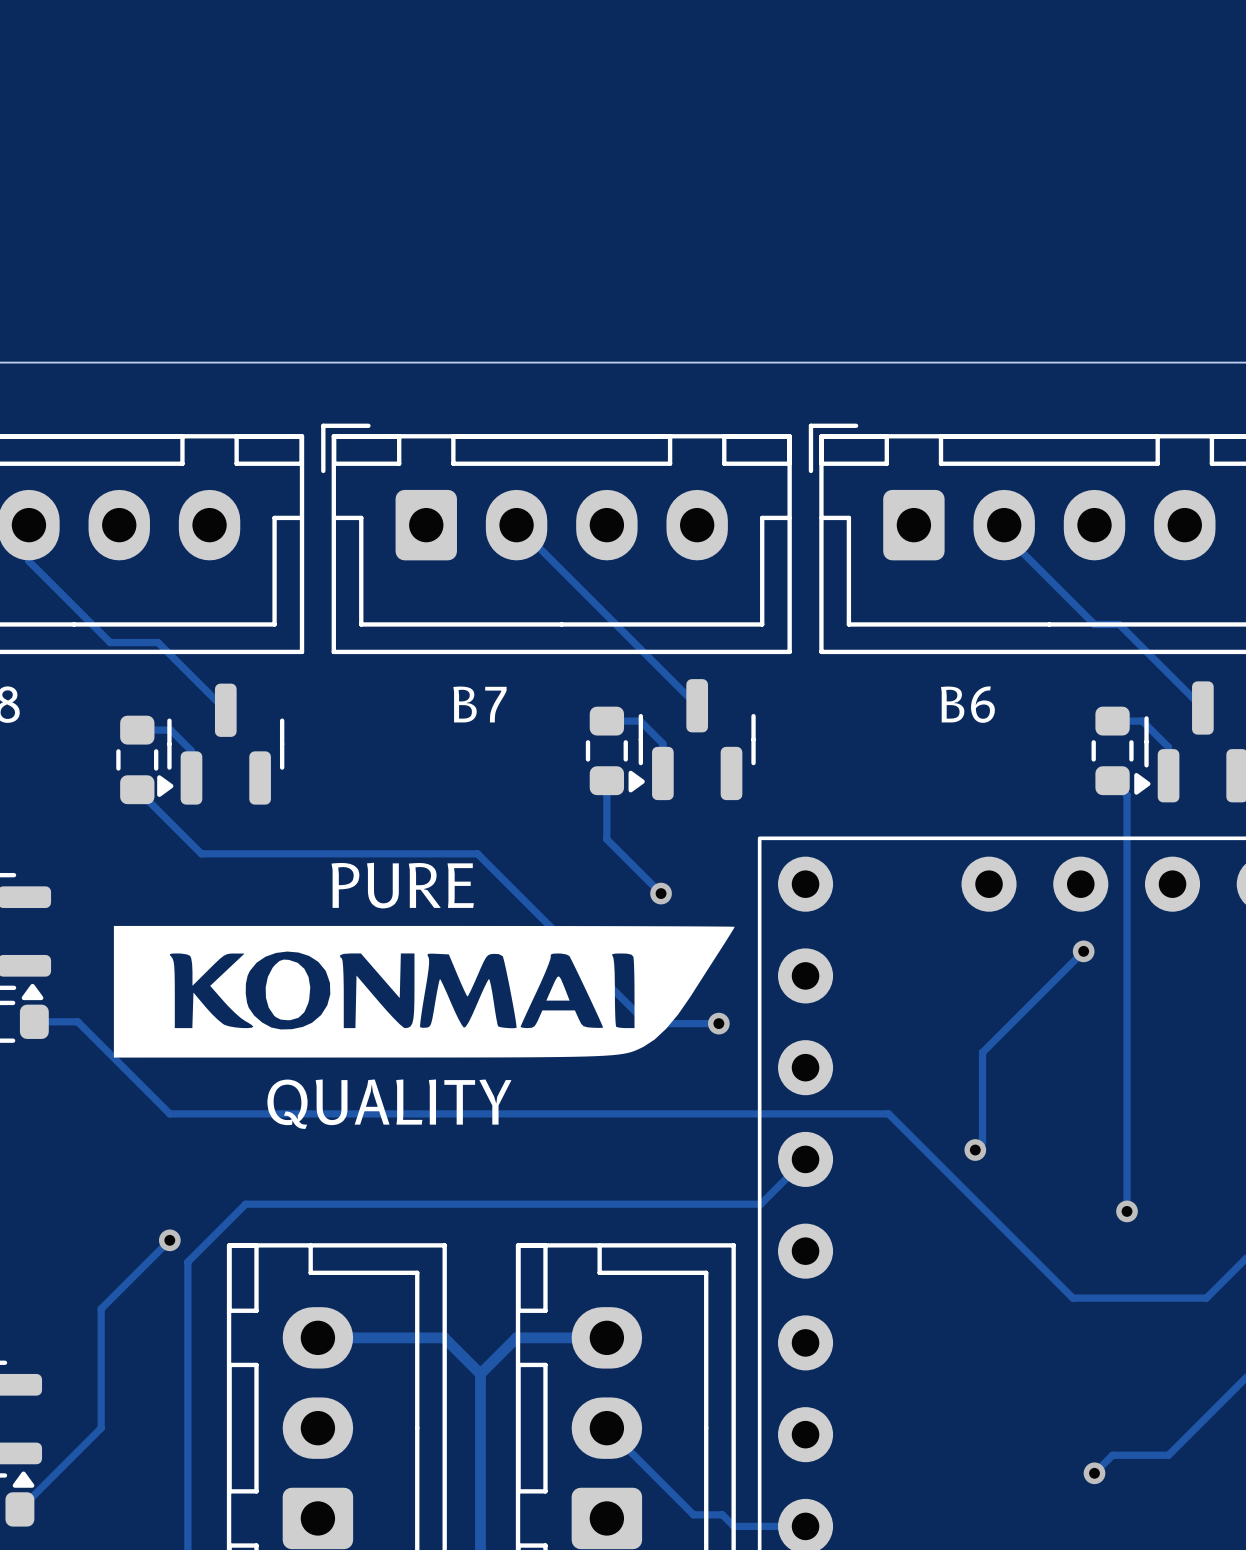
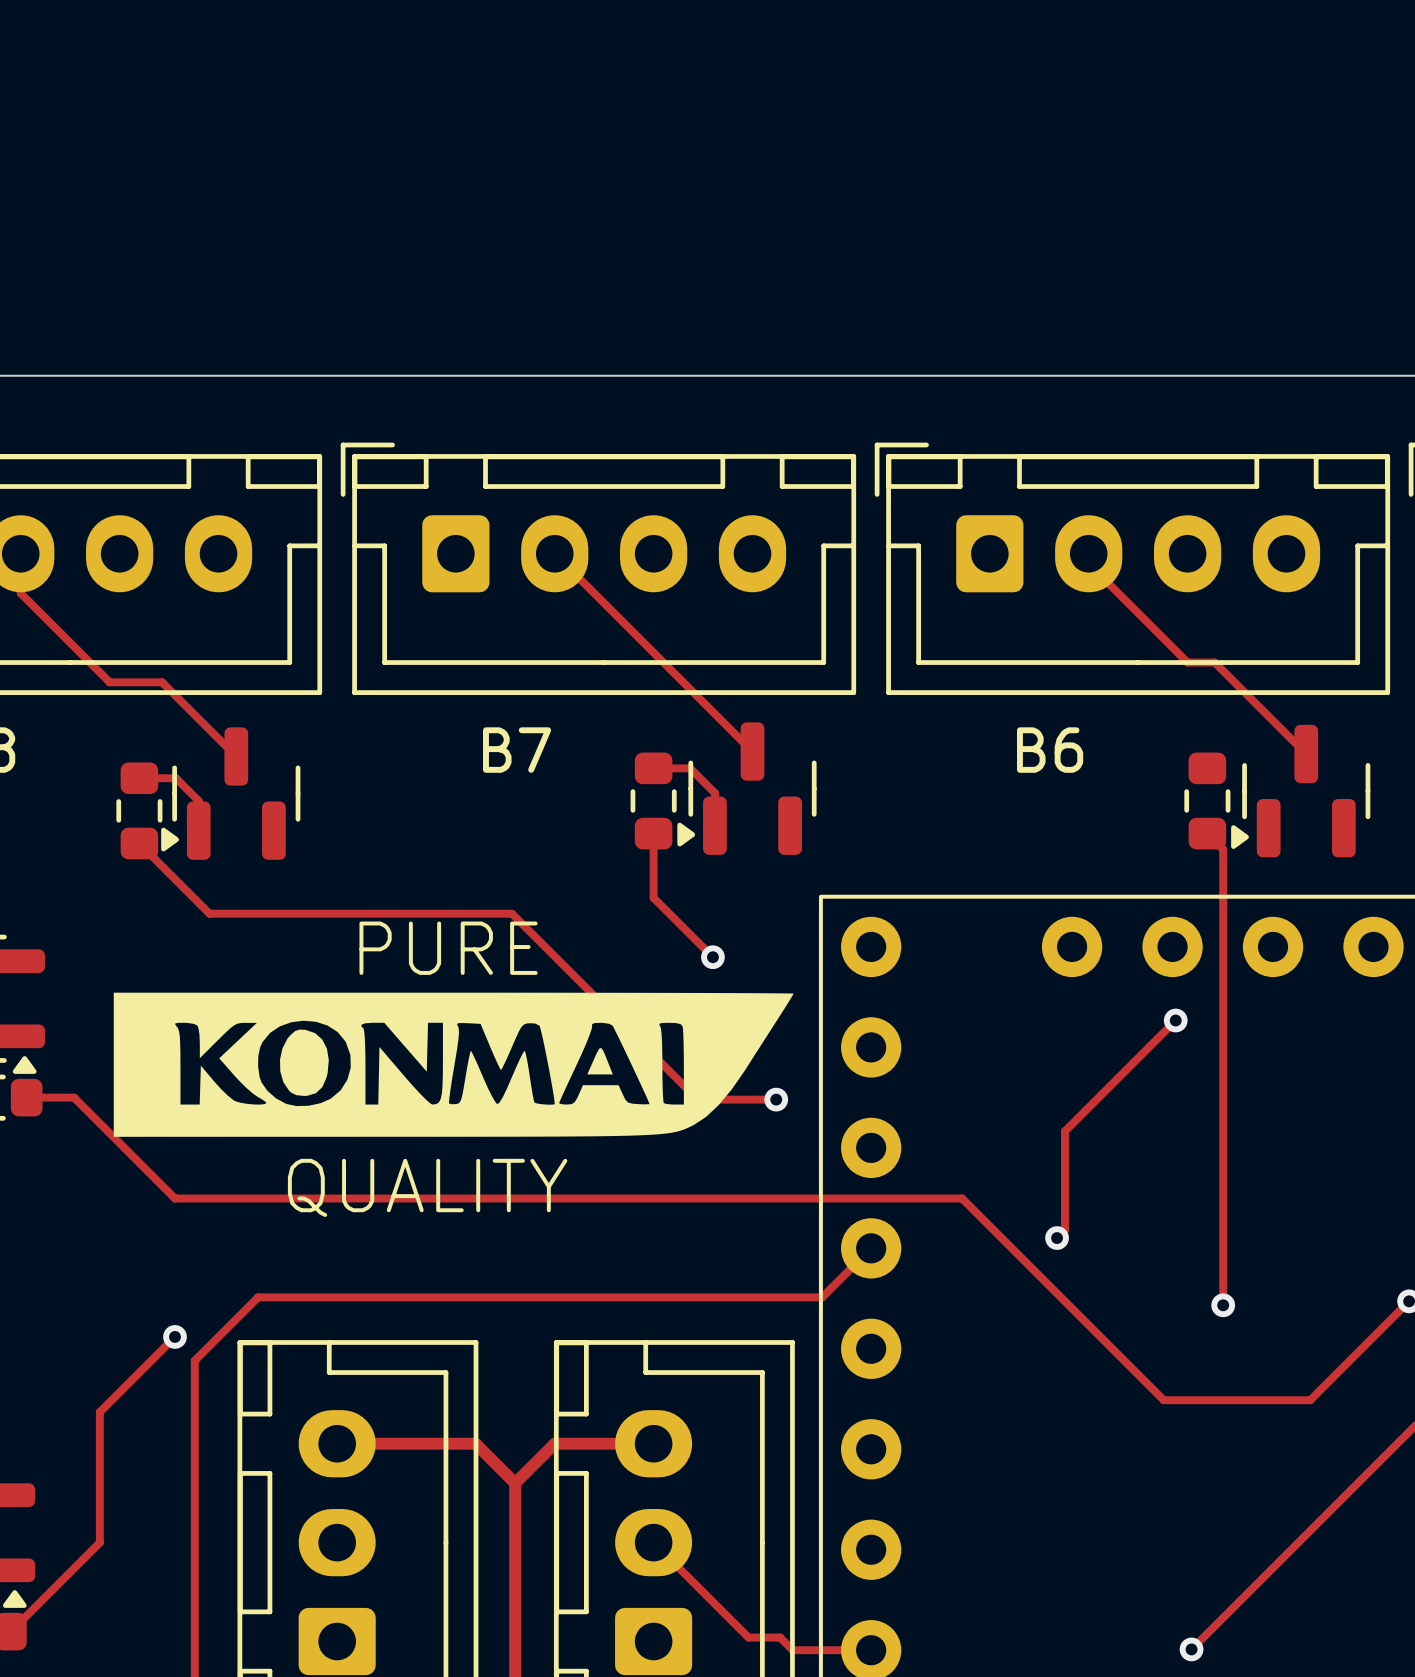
track: (1112, 721) (1142, 721) (1168, 747) (1168, 775) -> none
track: (1168, 1455) (1112, 1455) (1094, 1473) -> (1268, 1572) (1191, 1649)
via position: (1094, 1473) -> (1191, 1649)

